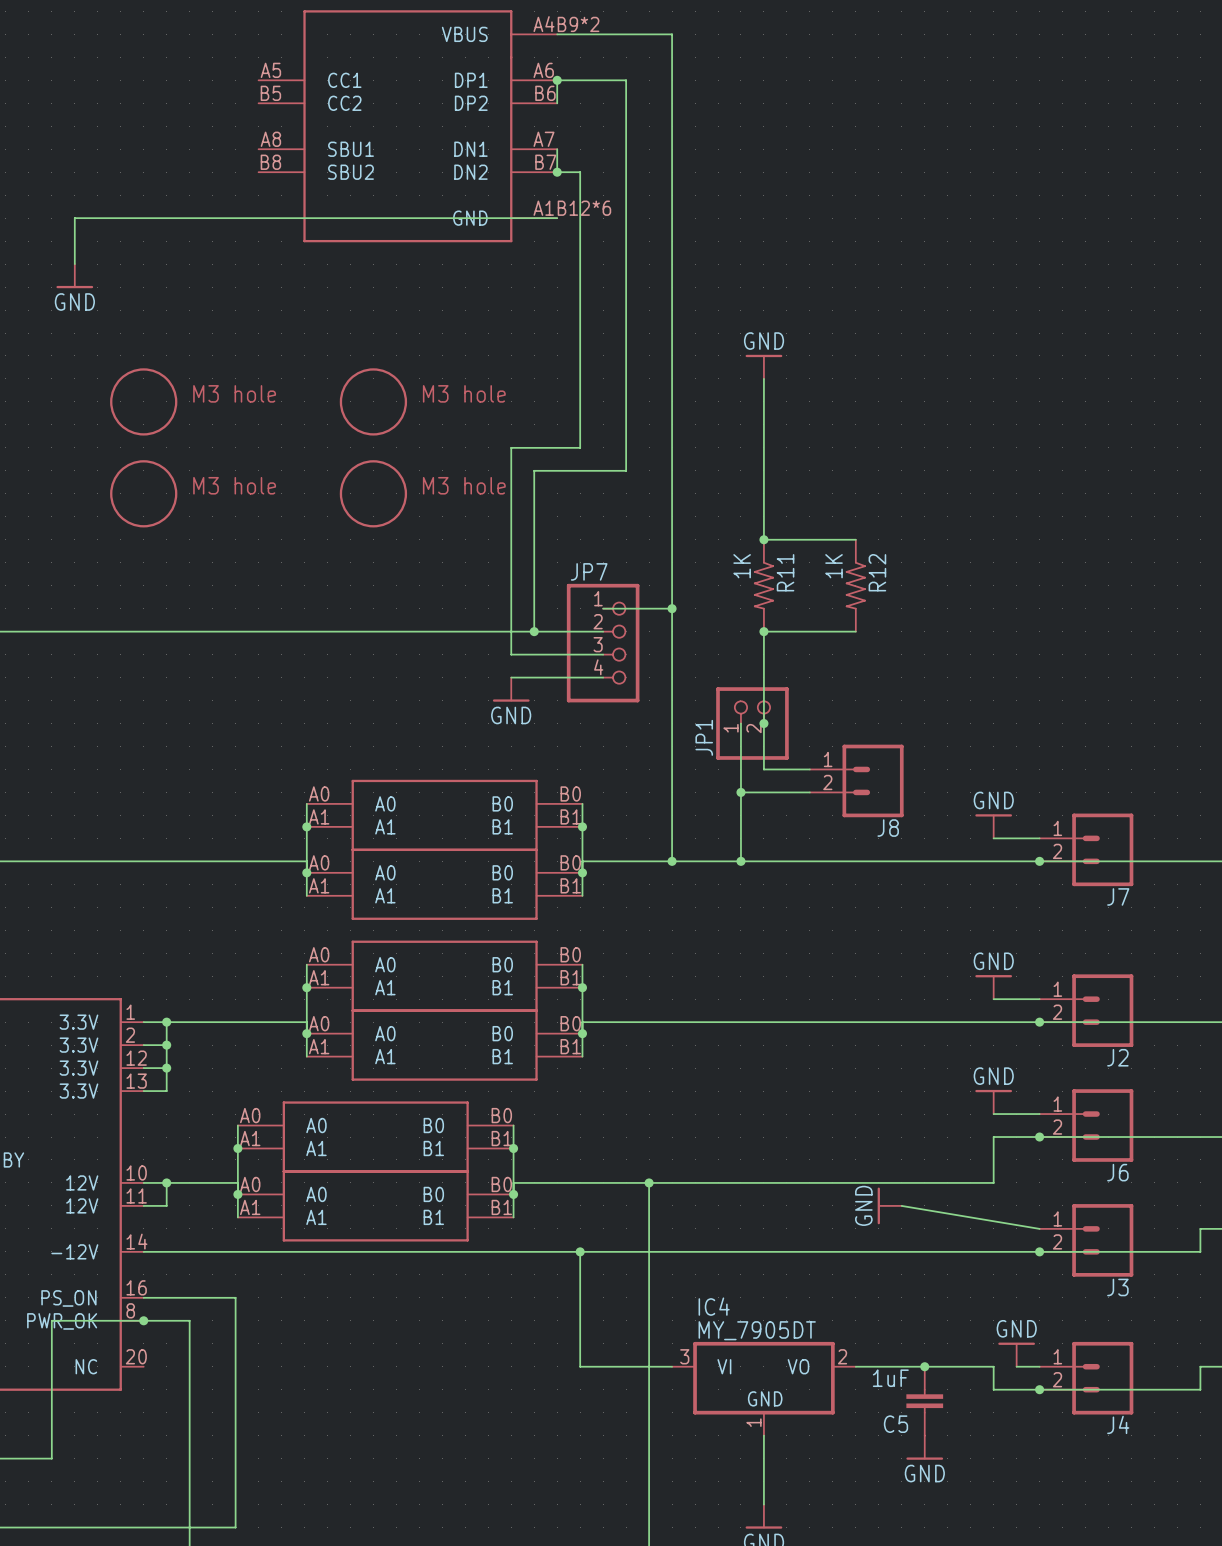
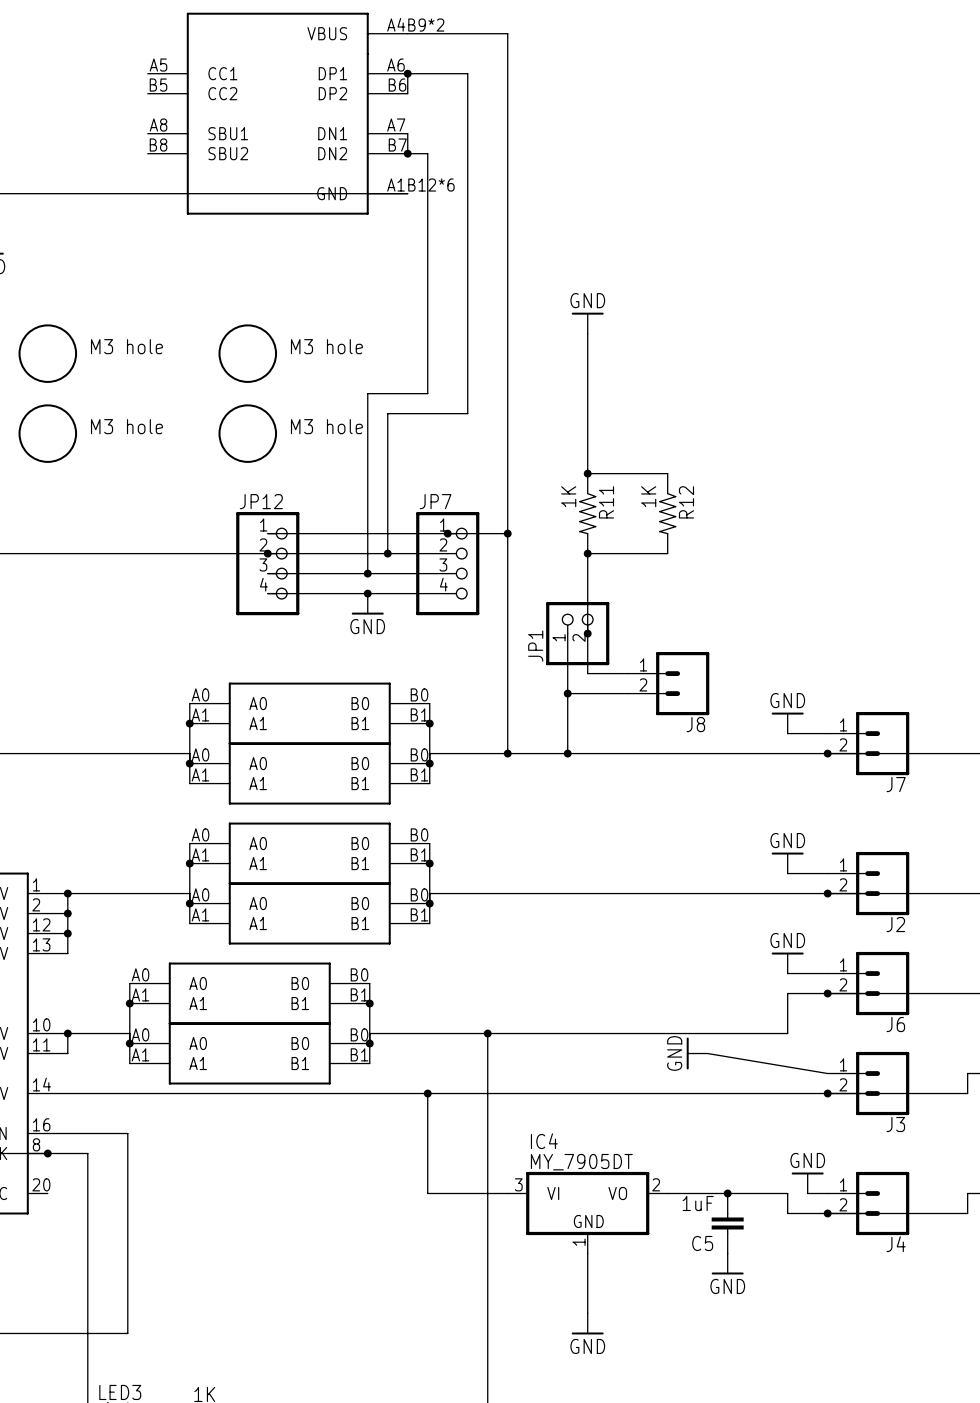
wire: none -> (267, 533) (447, 533)
junction: none -> (447, 533)
junction: none -> (267, 553)
JP12: none -> (267, 563)
wire: none -> (267, 573) (367, 573)
junction: none -> (367, 573)
wire: none -> (267, 593) (367, 593)
junction: none -> (367, 593)

